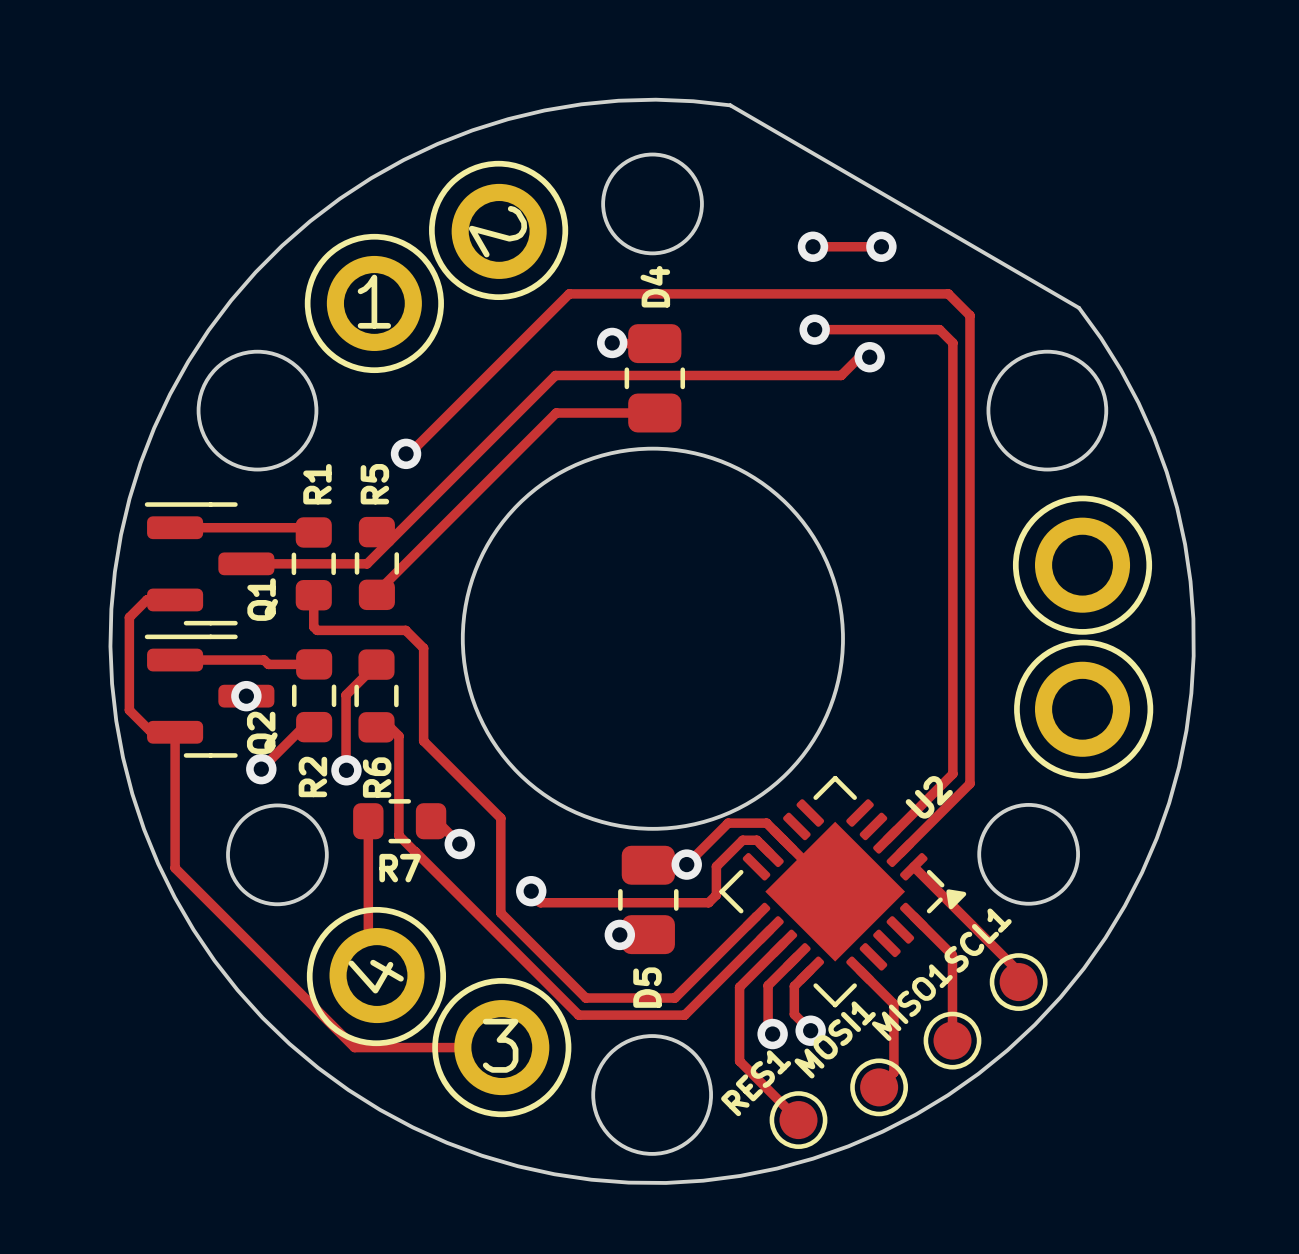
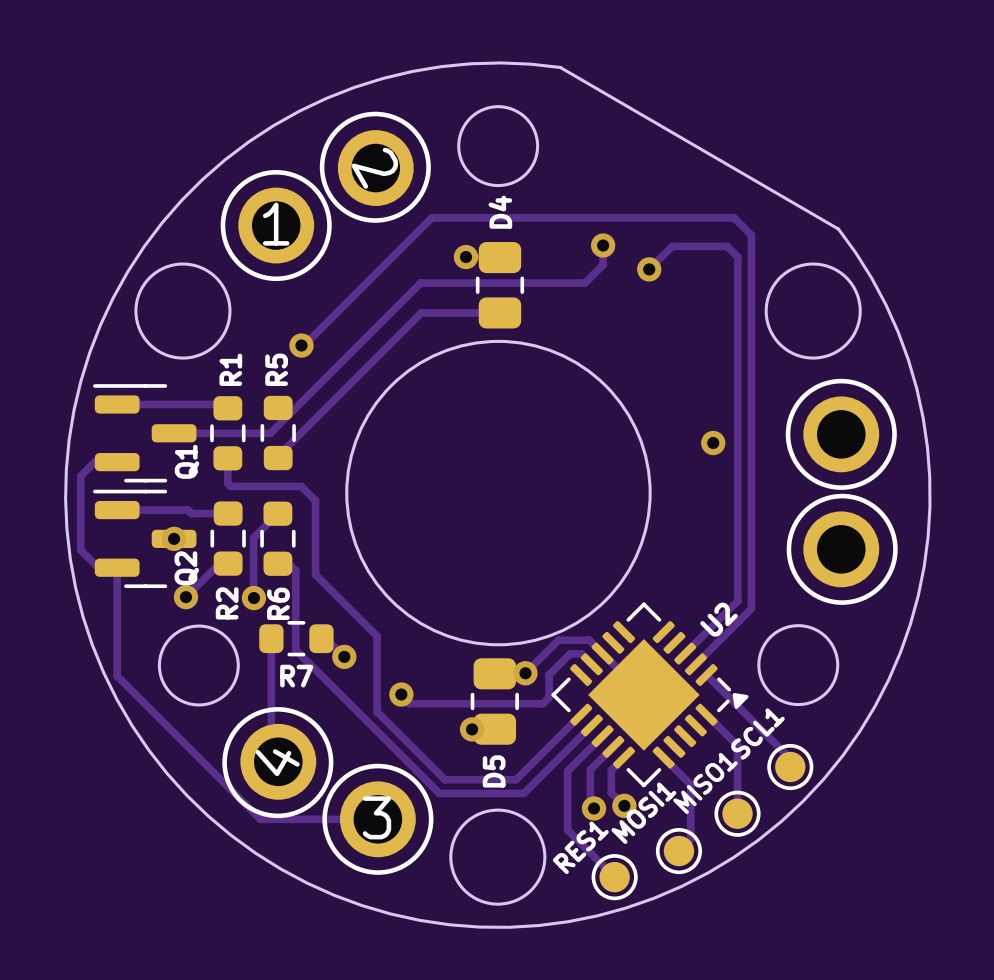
via: (812, 246) -> none
track: (881, 246) (806, 247) -> none
via: (881, 246) -> none
via: none -> (603, 245)
track: (814, 329) (870, 329) -> (649, 269) (672, 246)
via: (814, 329) -> none
track: (869, 357) (859, 357) (841, 375) (761, 375) -> (603, 245) (603, 264) (585, 283)
via: (869, 357) -> none
via: none -> (649, 269)
via: none -> (713, 443)

